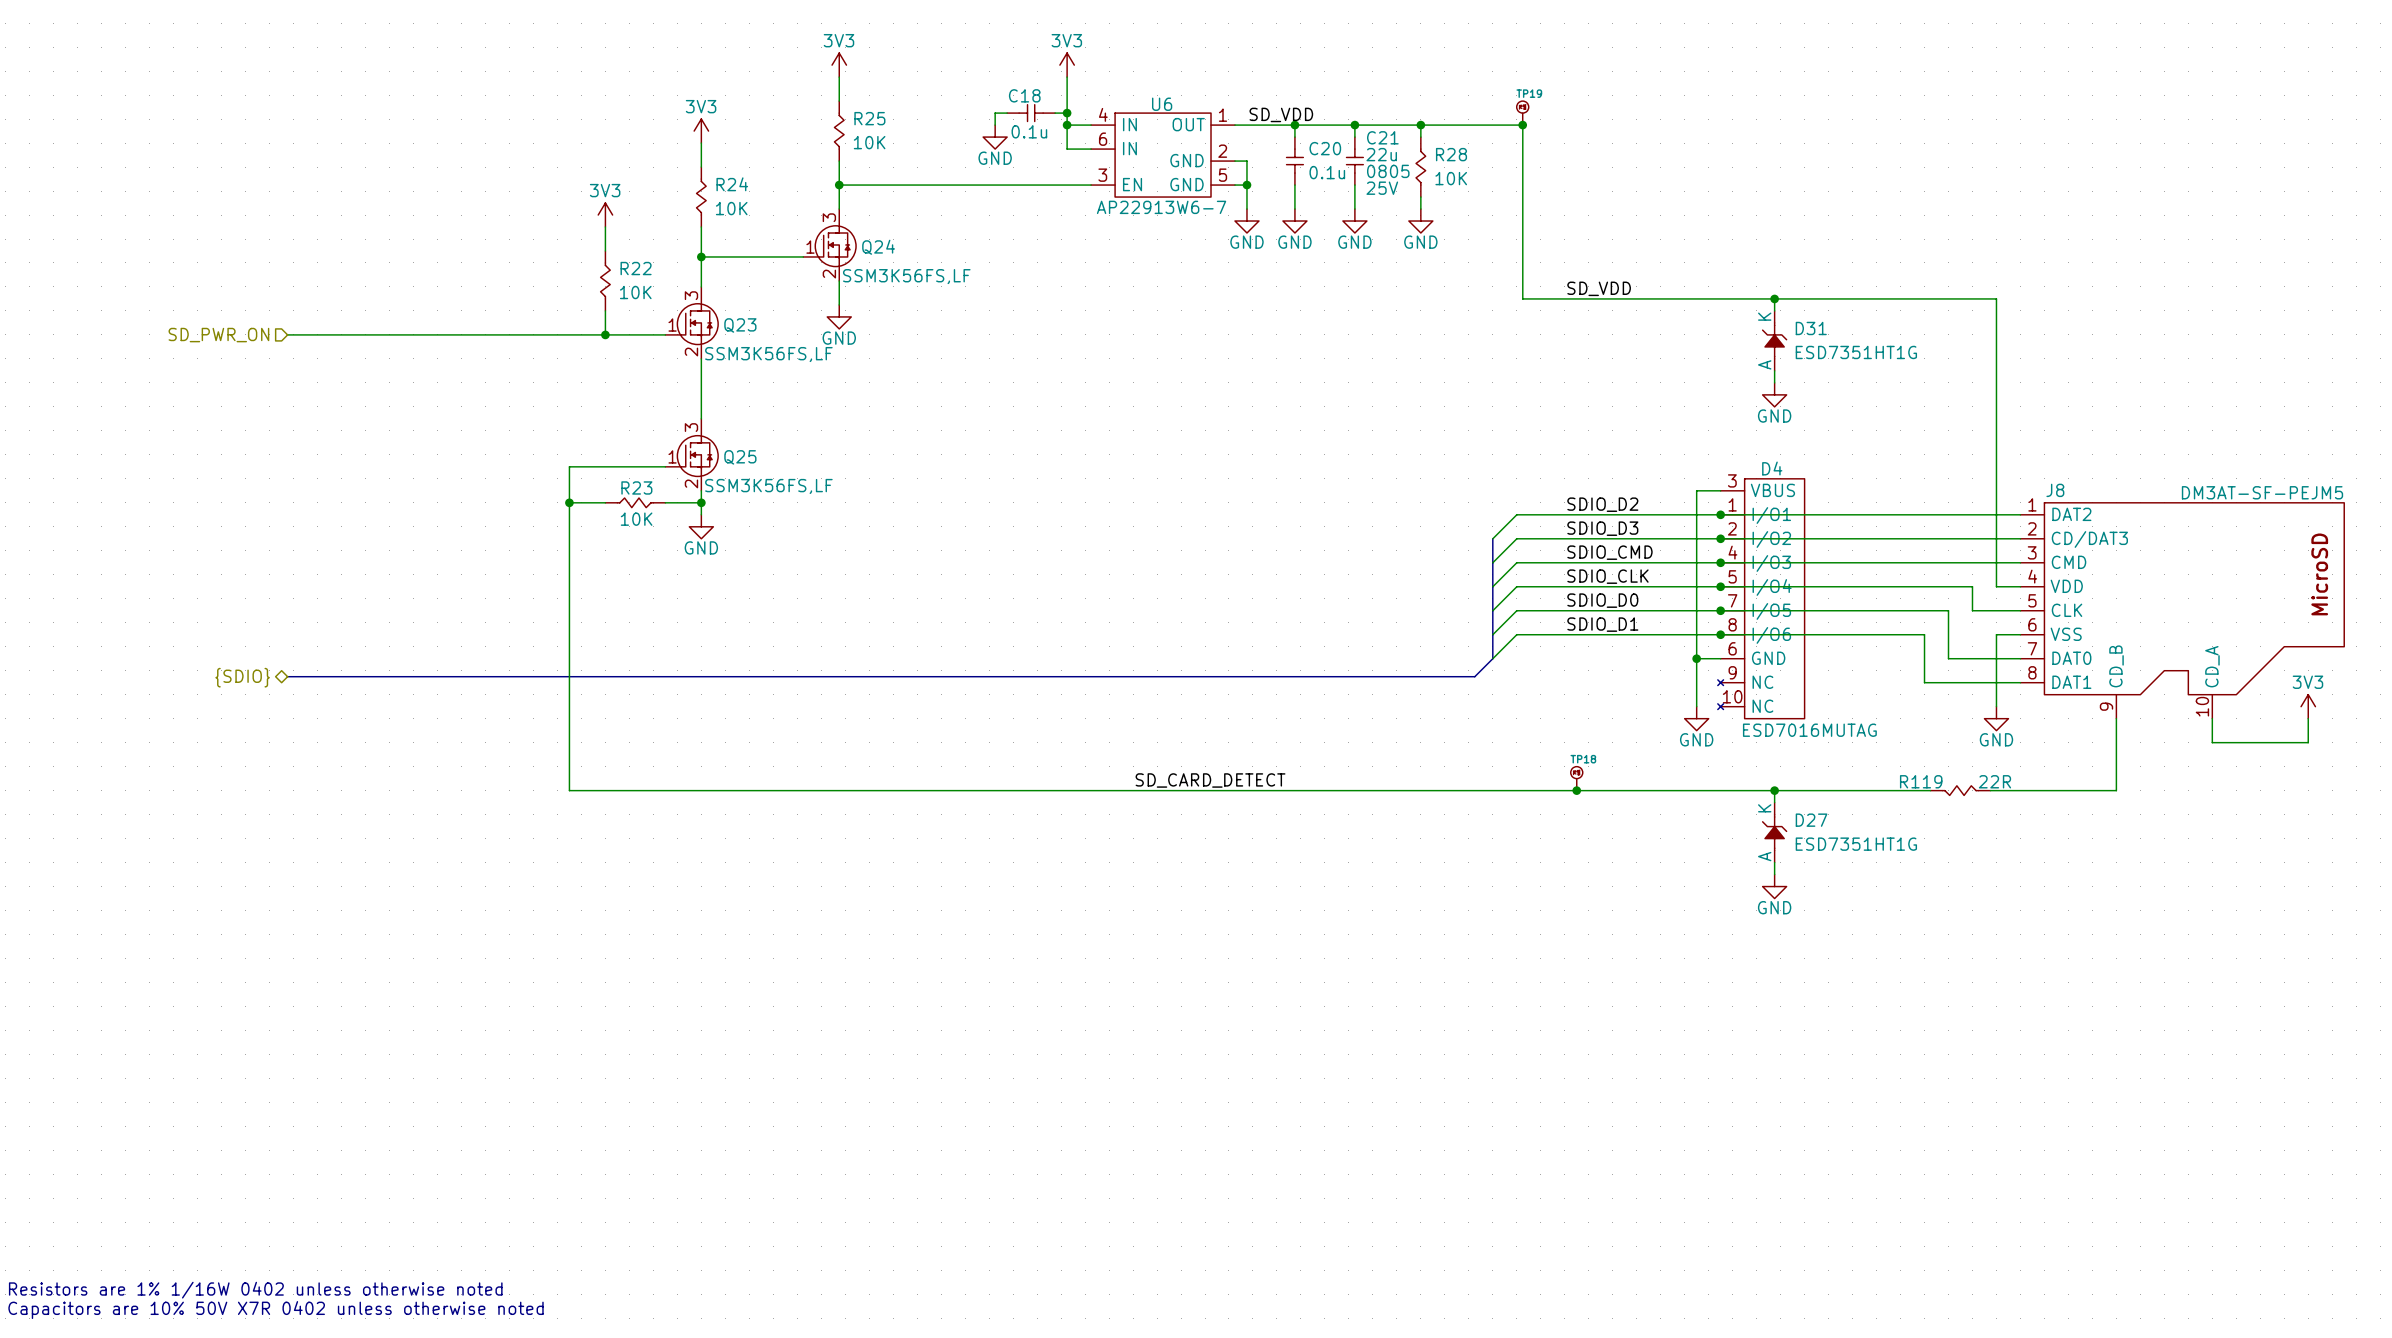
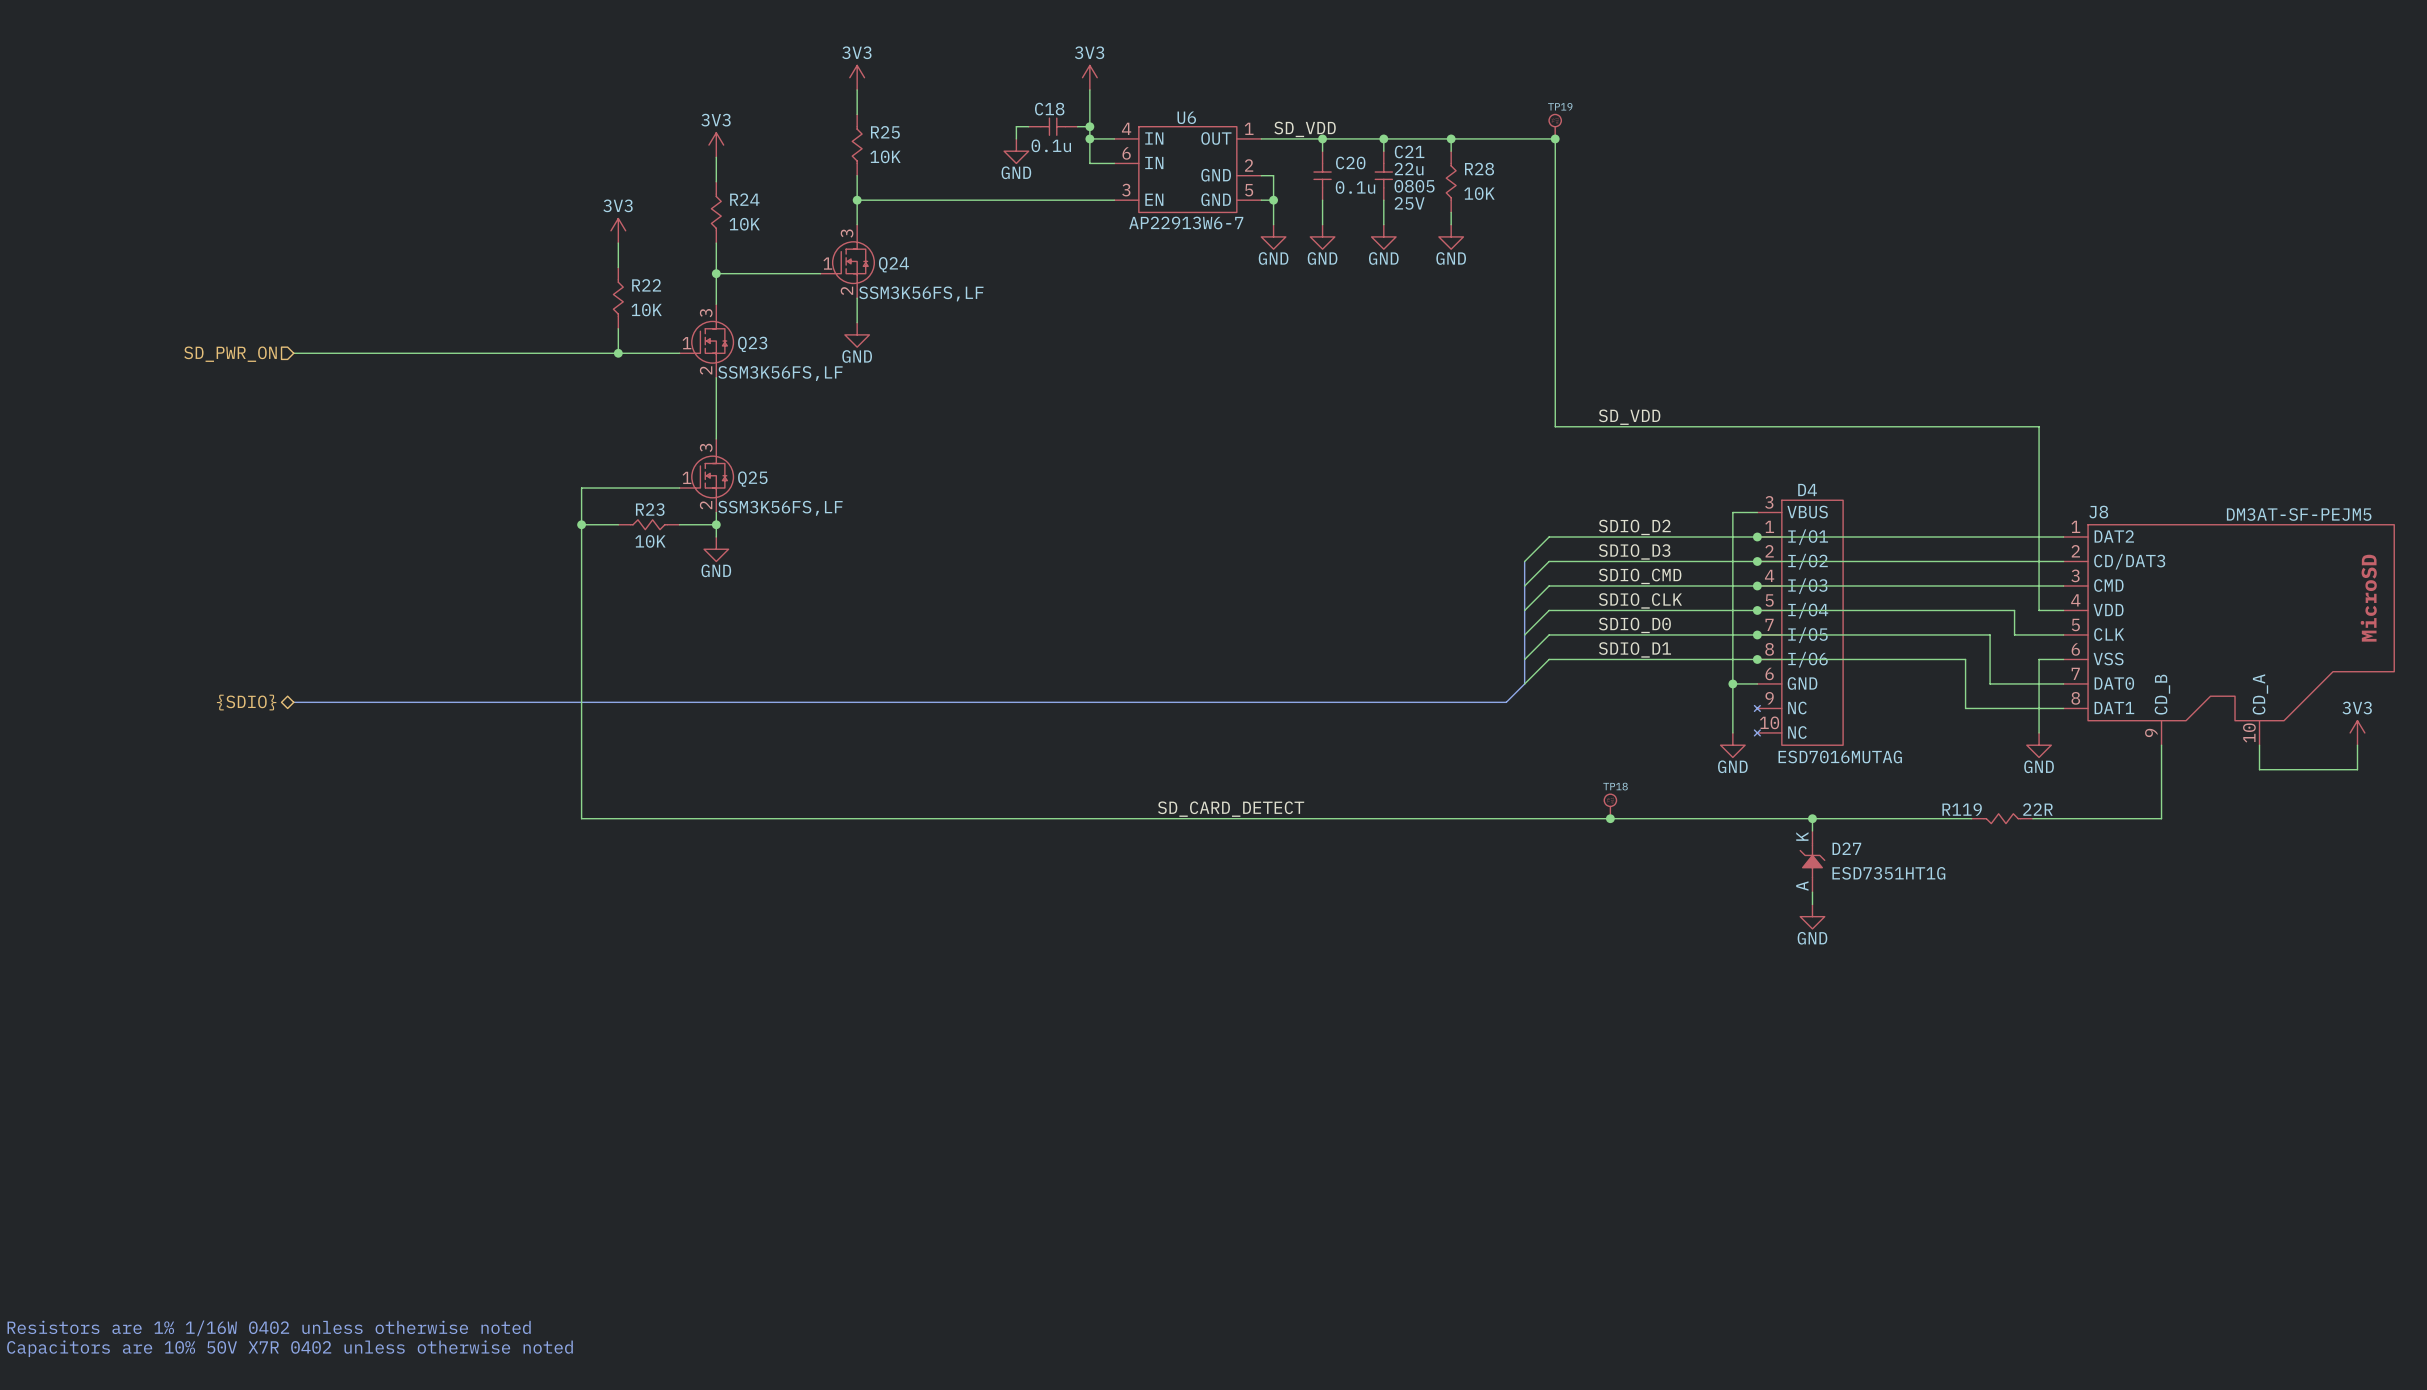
label position: SD_VDD (1599, 288) -> SD_VDD (1629, 417)
wire: (1522, 298) (1996, 298) (1996, 406) -> (1555, 316) (1555, 426) (2039, 426)
wire: (1774, 298) (1774, 310) -> none
junction: (1774, 298) -> none
D31: ESD7351HT1G (1774, 340) -> none
wire: (1774, 370) (1774, 382) -> none
power symbol: GND (1774, 394) -> none

